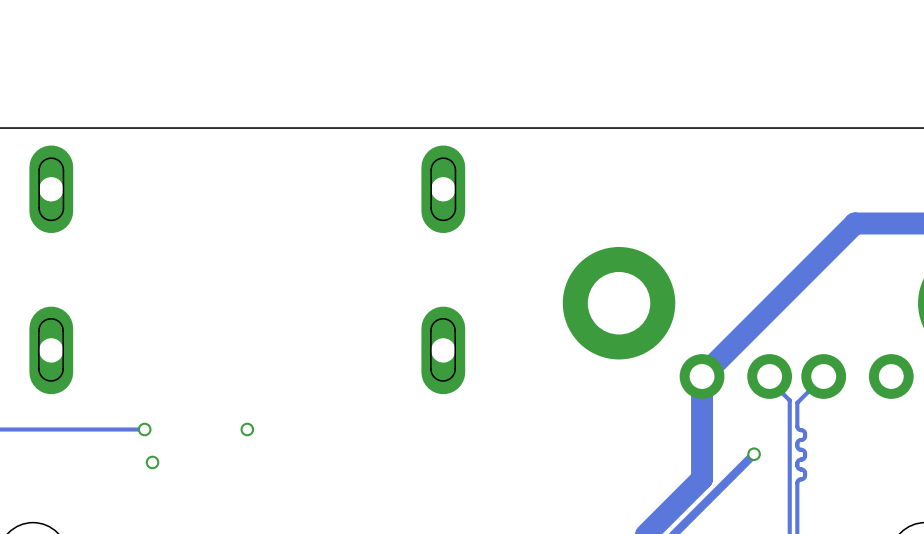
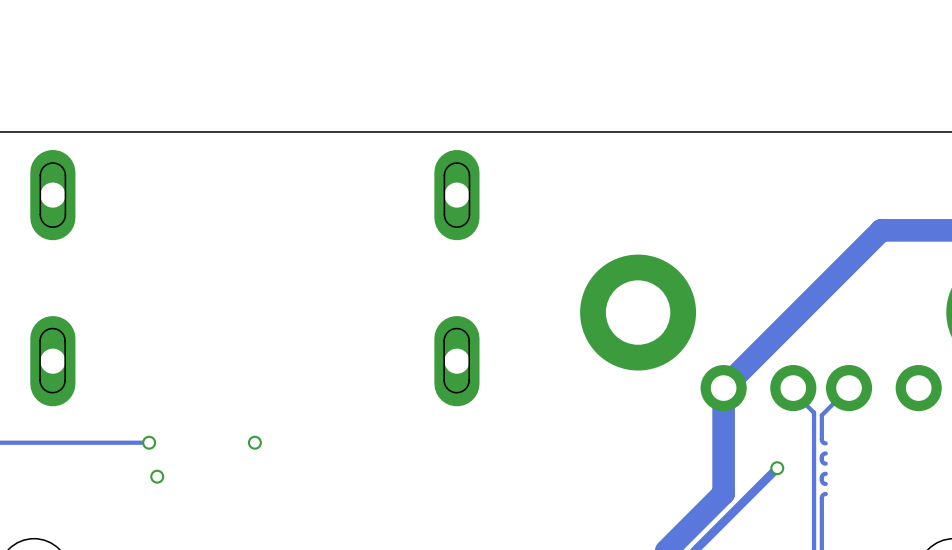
track: (801, 430) (805, 433) (804, 438) (801, 439) -> none
track: (801, 449) (805, 453) (804, 457) (801, 459) -> none
track: (801, 469) (805, 473) (804, 477) (801, 479) -> none

